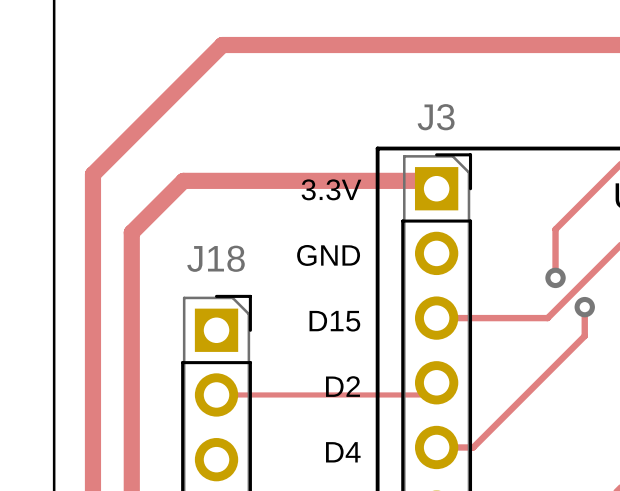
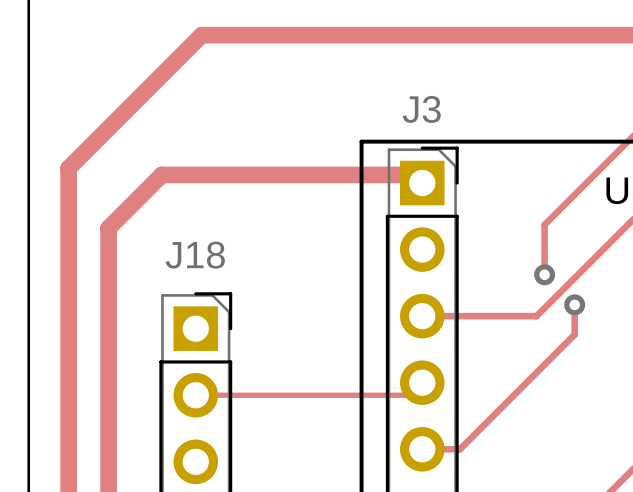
text: 3.3V (331, 189) -> none
text: GND (328, 255) -> none
text: D15 (334, 321) -> none
text: D2 (342, 386) -> none
text: D4 (343, 452) -> none

